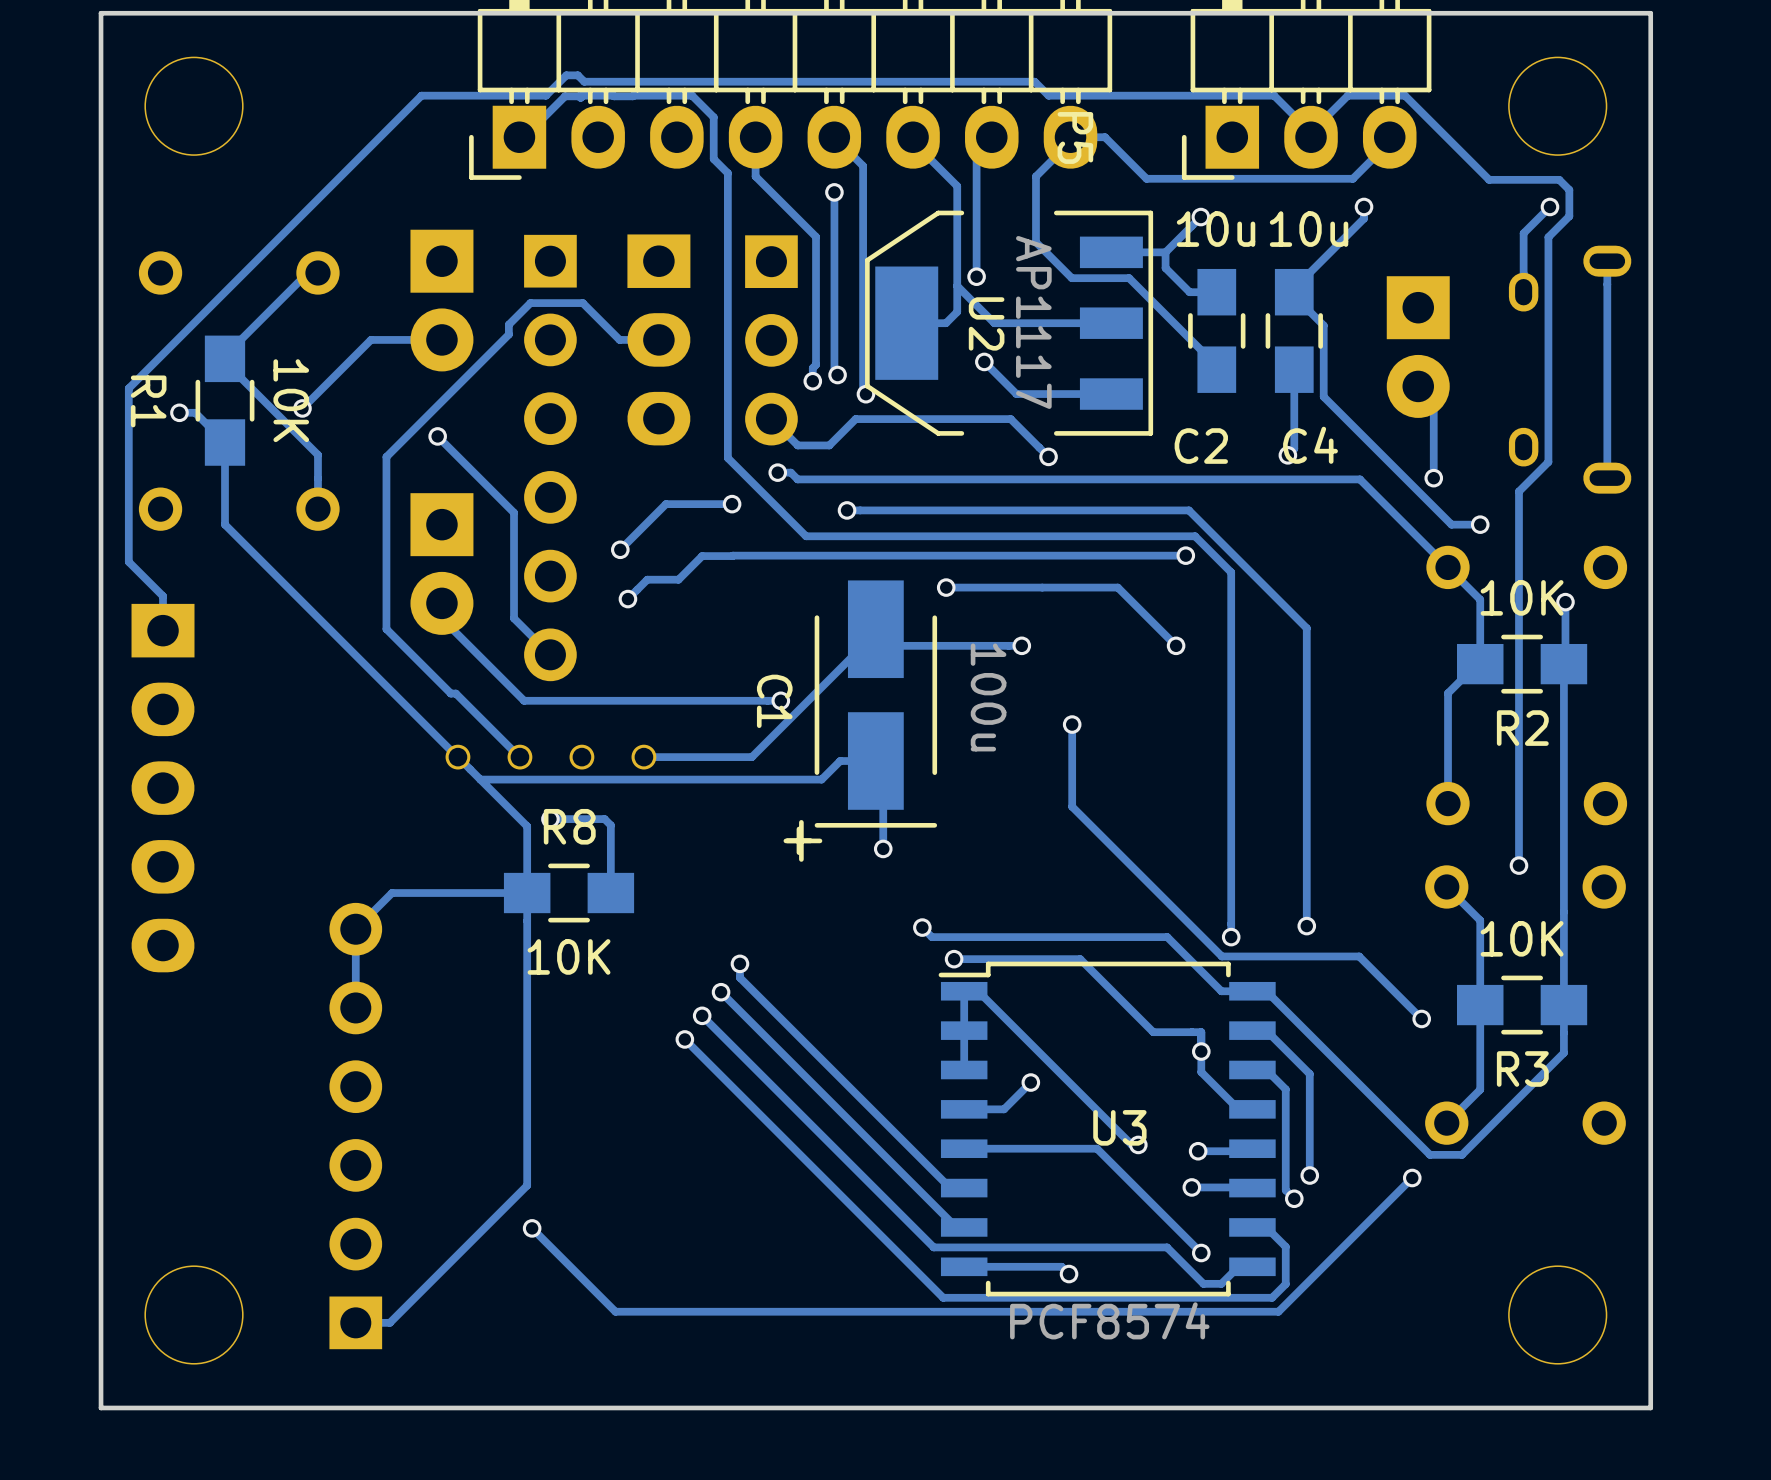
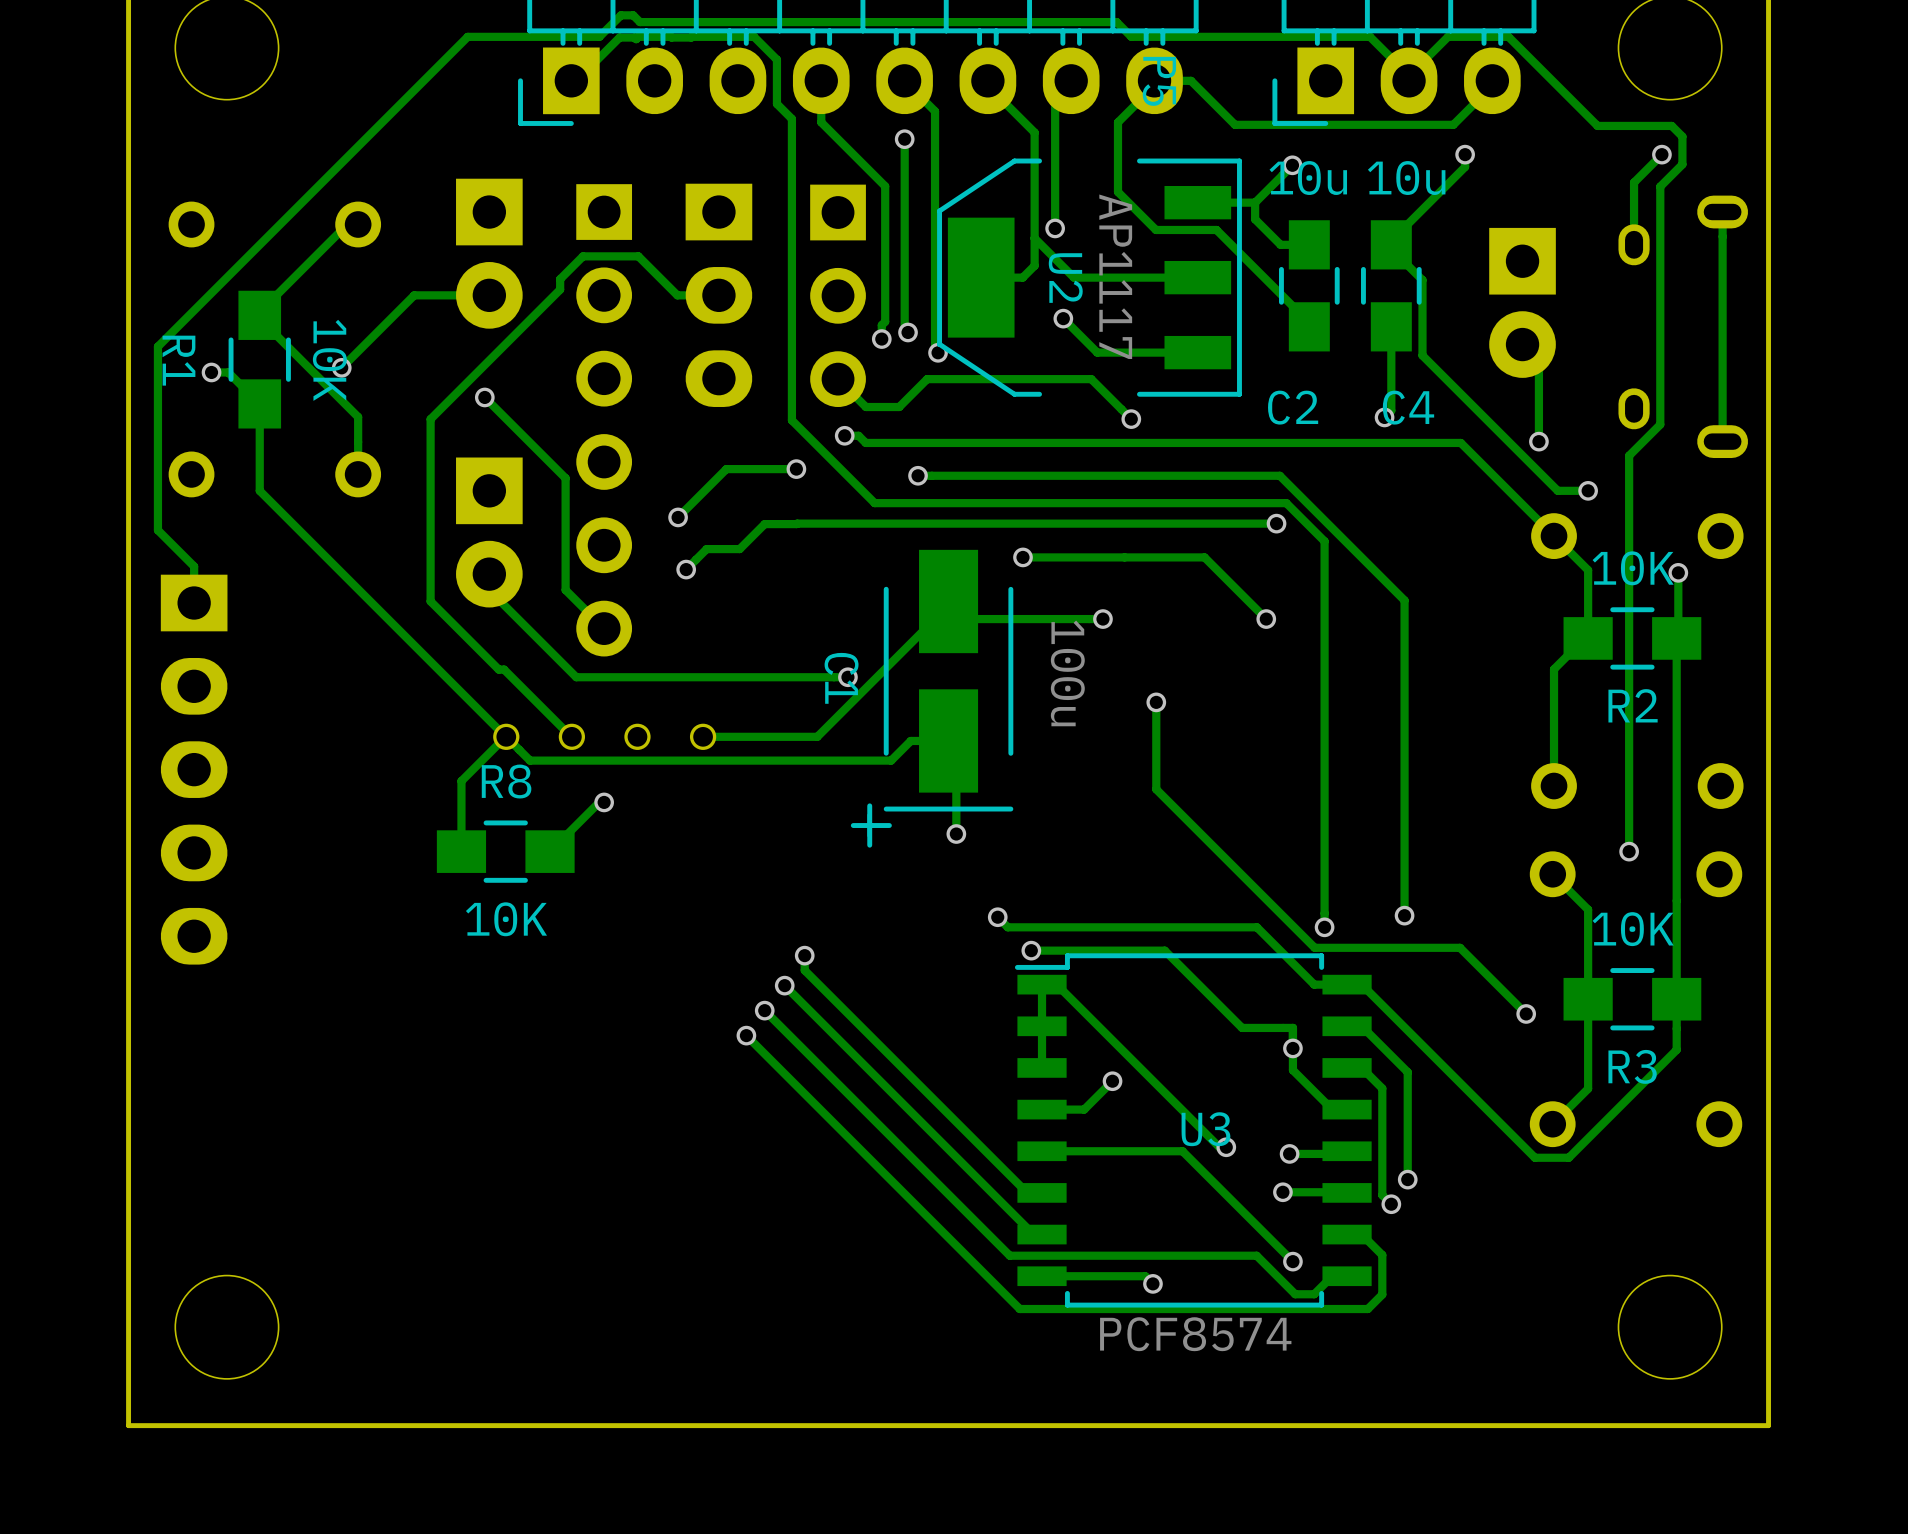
track: none -> (505, 736) (461, 781) (461, 851)
track: (480, 779) (527, 826) (527, 1185) (389, 1322) (355, 1322) -> none
track: none -> (599, 802) (550, 851)
track: (550, 819) (604, 819) (610, 825) (610, 893) -> none
track: (527, 893) (392, 893) (355, 929) (355, 1007) -> none
R8 position: (569, 893) -> (505, 851)
part: (355, 1126) -> none
track: (1412, 1178) (1278, 1311) (615, 1311) (532, 1228) -> none
via: (1412, 1178) -> none
via: (532, 1228) -> none

